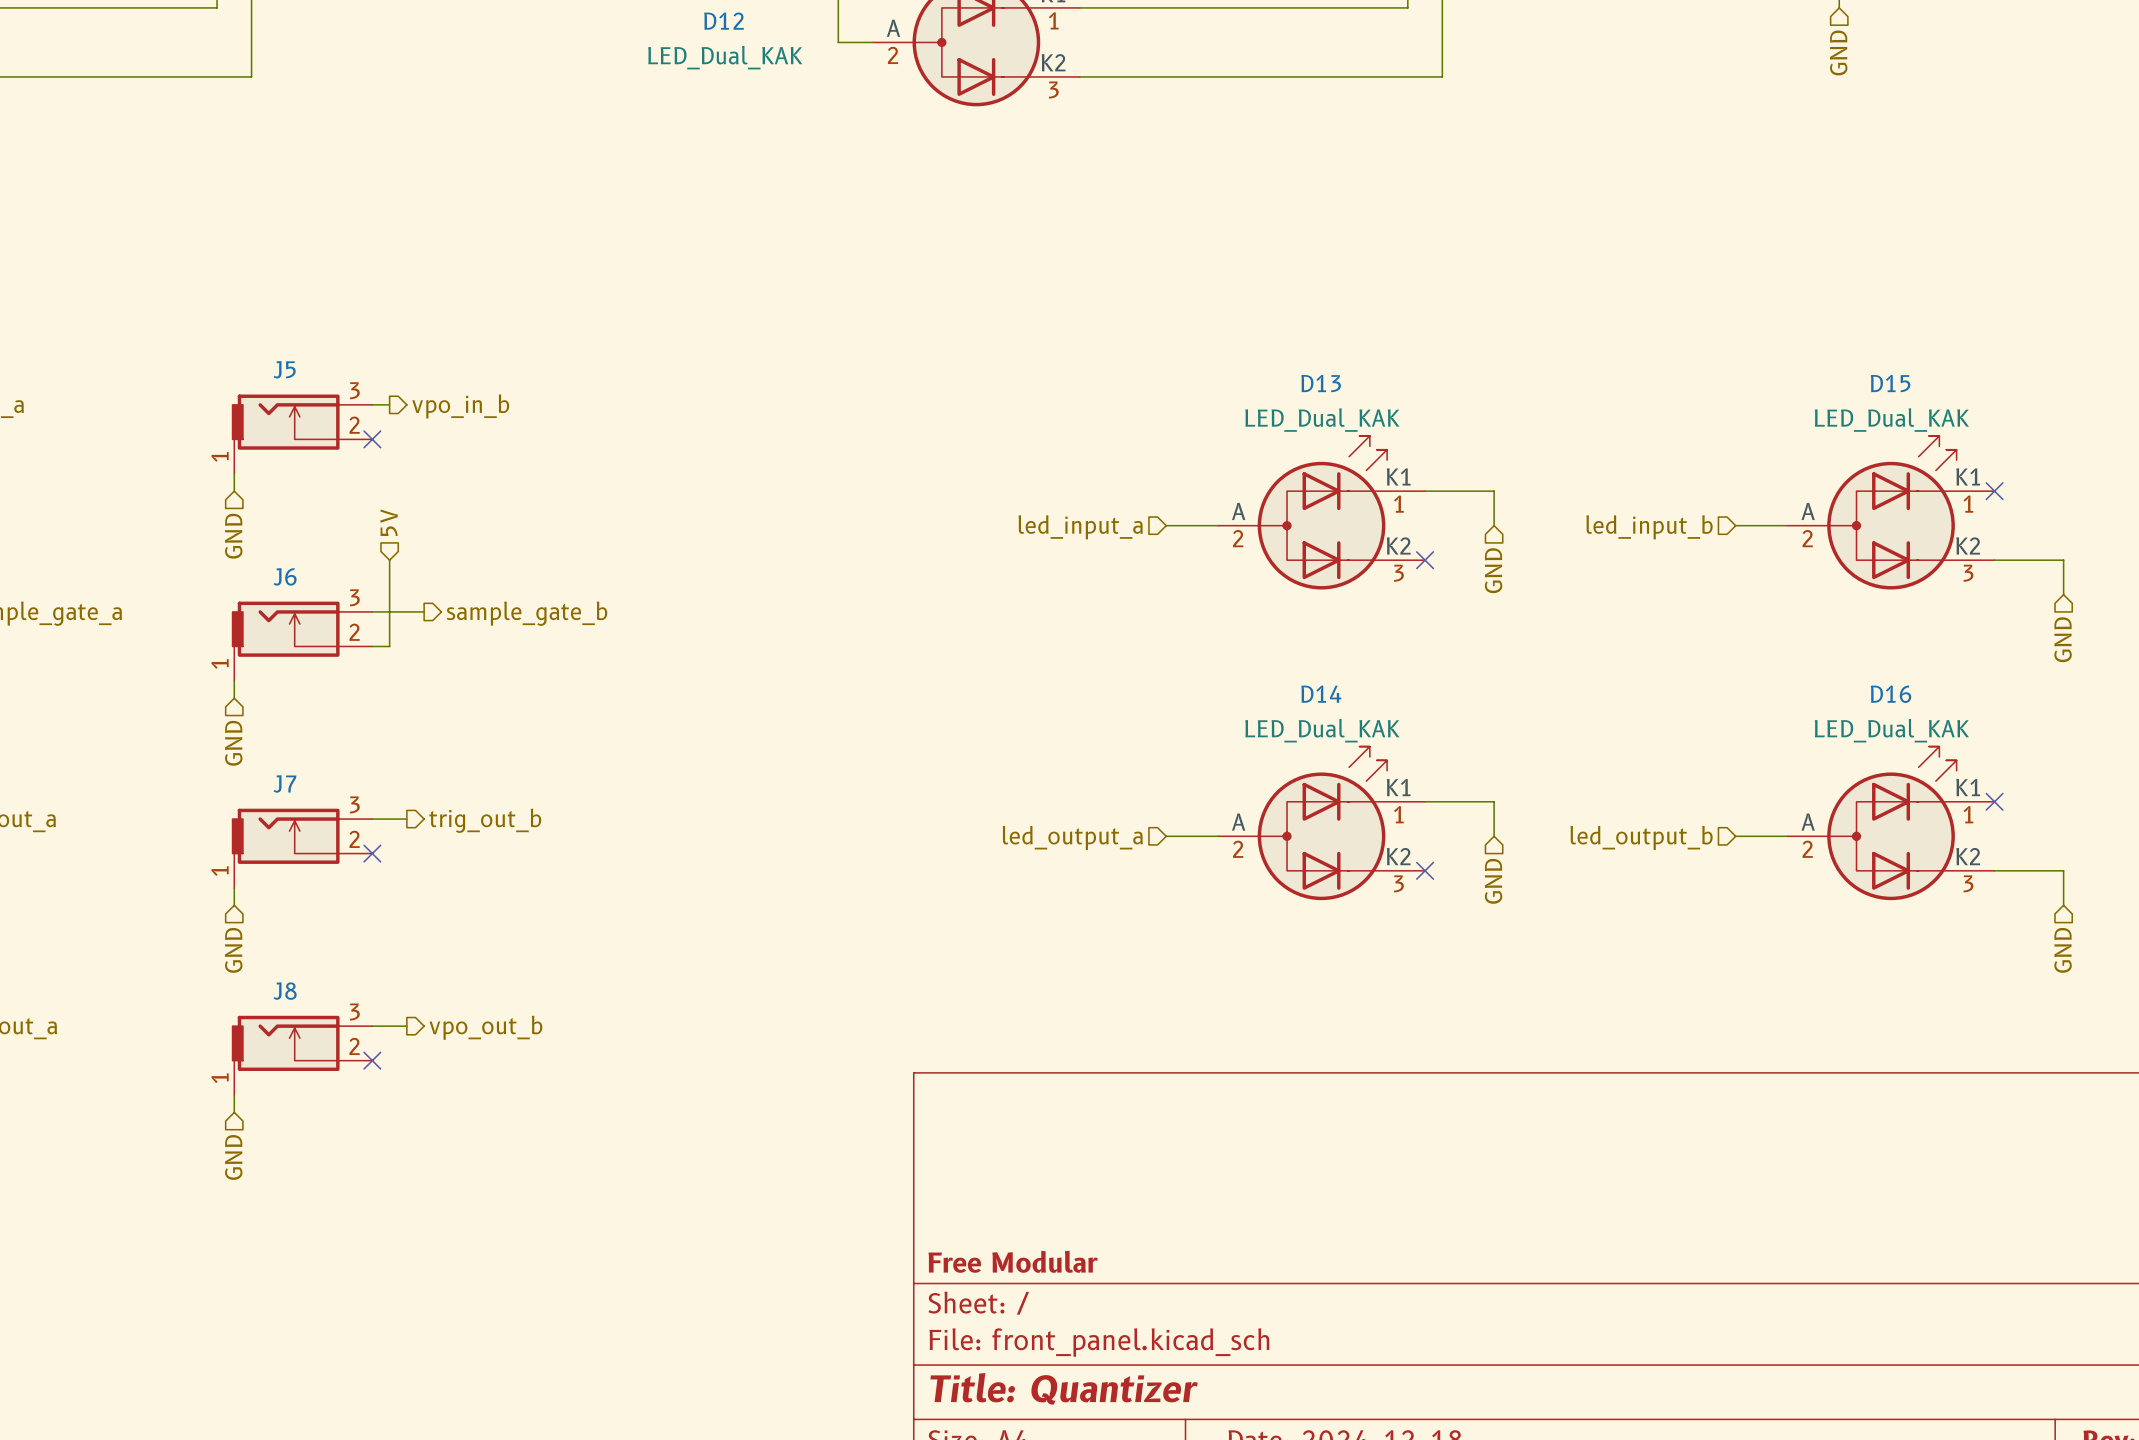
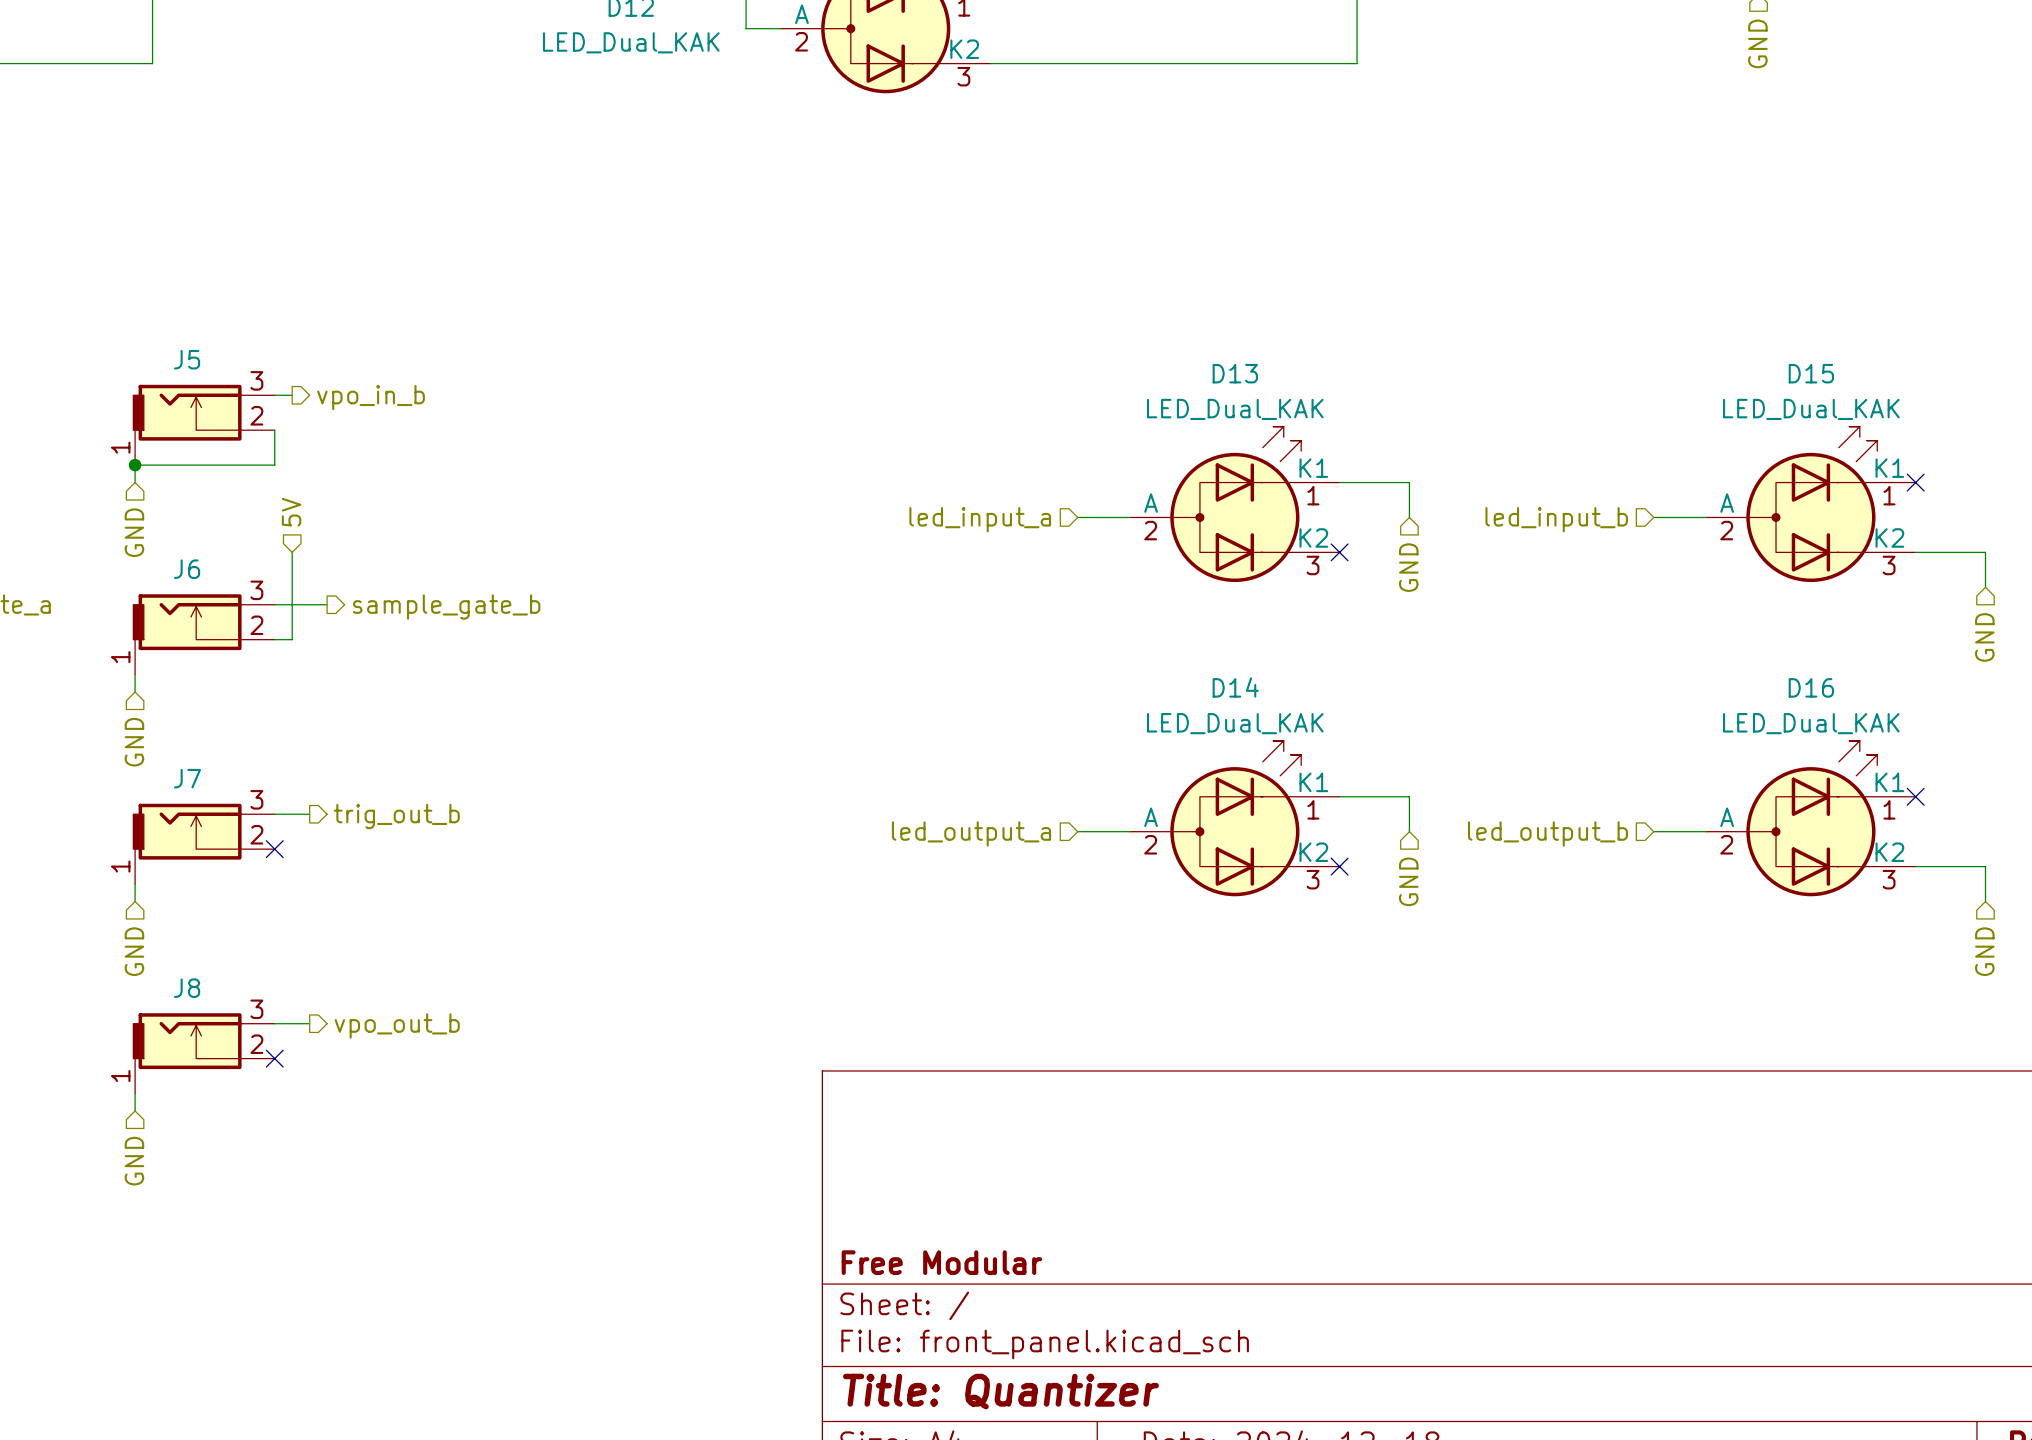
wire: none -> (274, 430) (274, 465) (135, 465)
no-connect mark: (372, 439) -> none
junction: none -> (135, 465)

